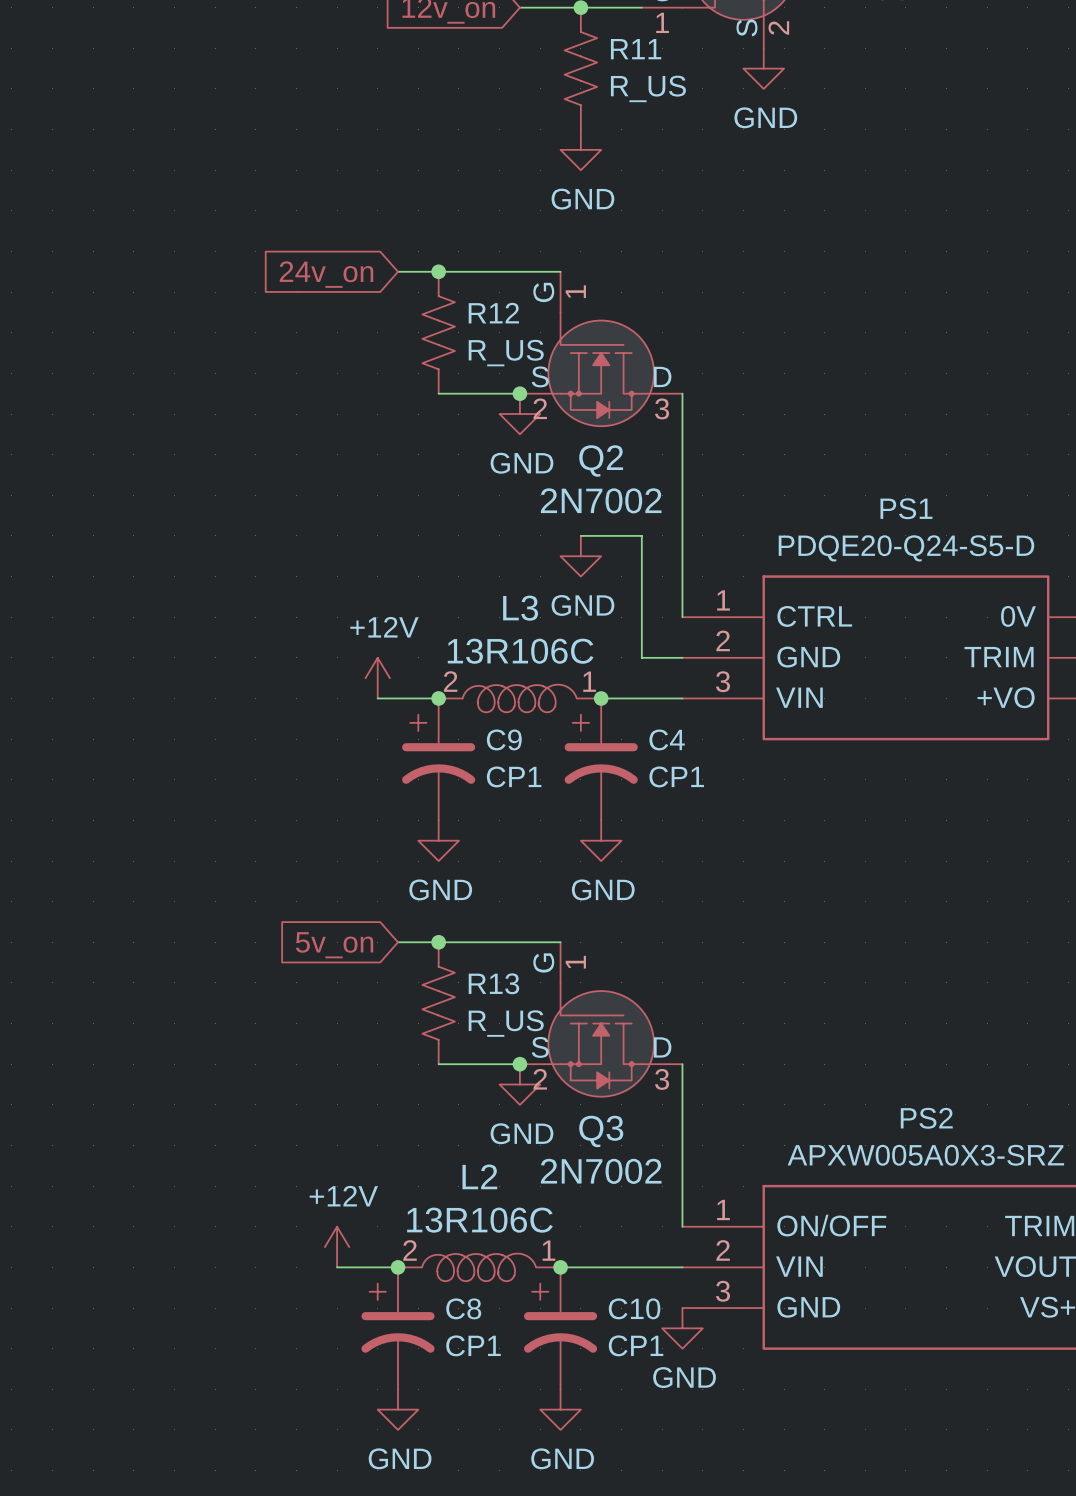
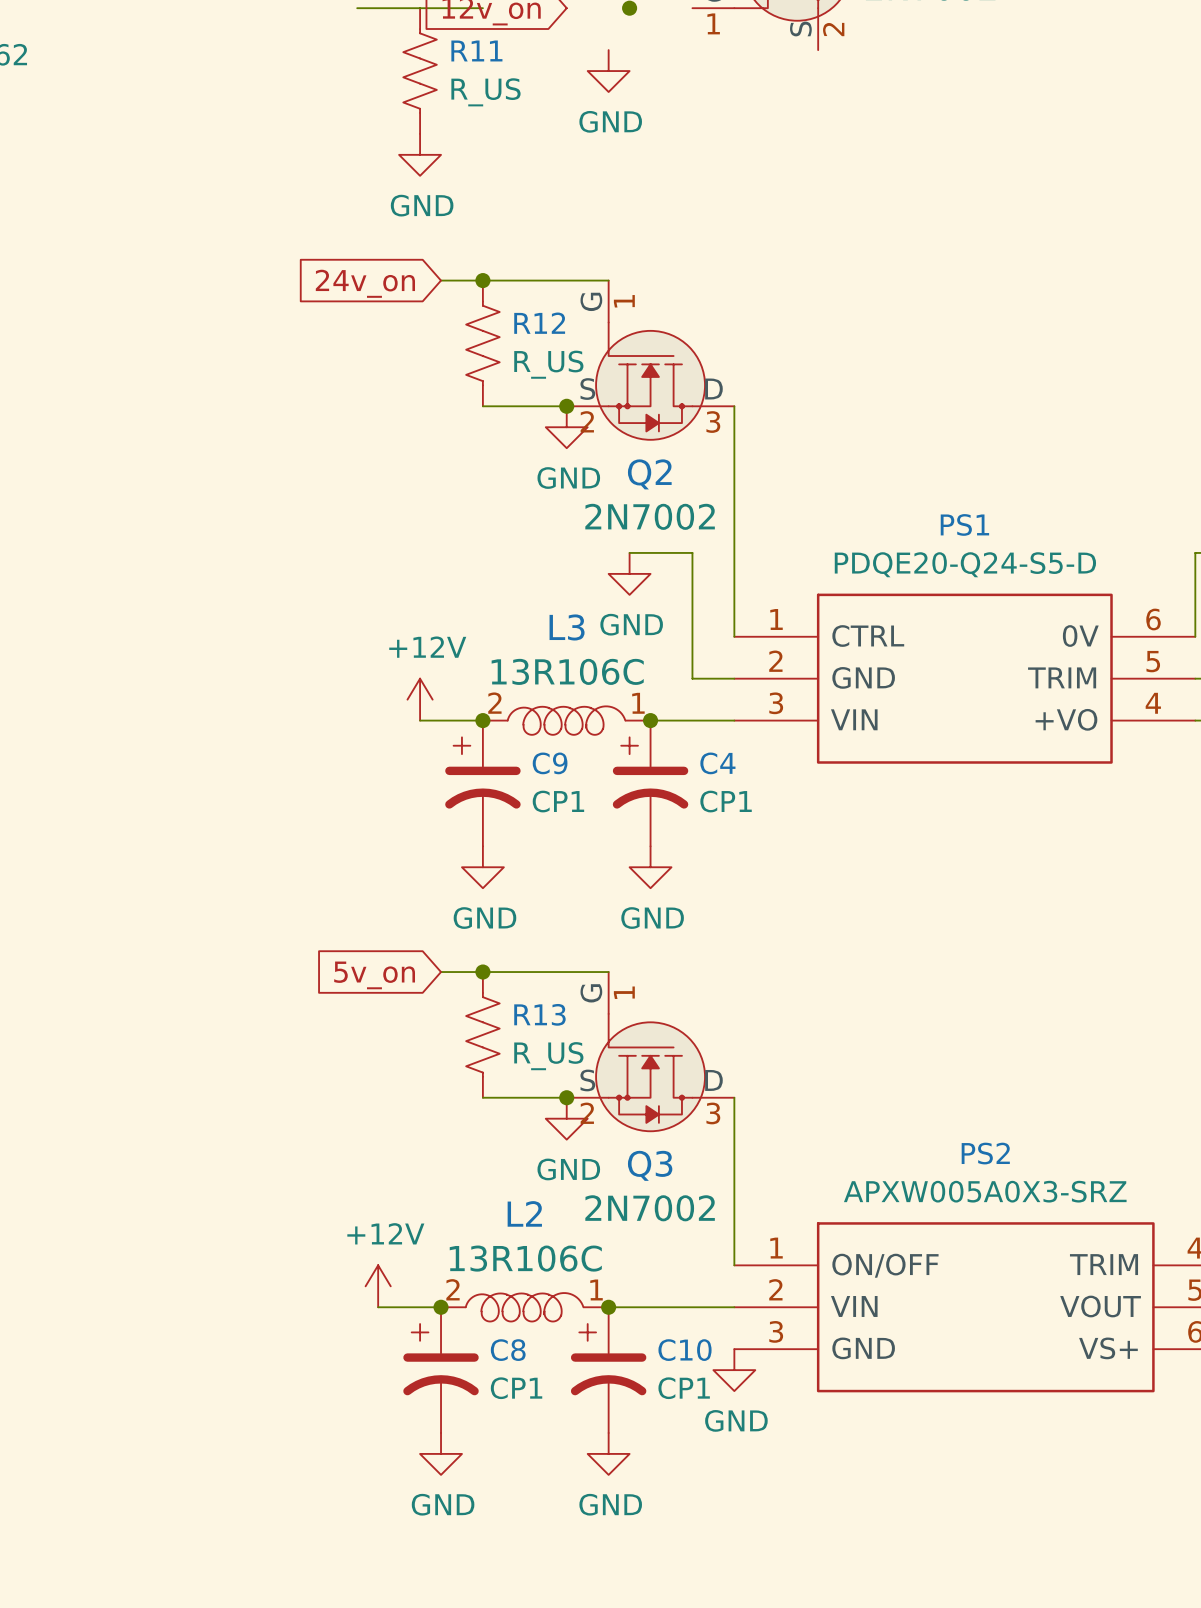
wire: (519, 7) (641, 7) -> (357, 8) (482, 8)
R11 position: (580, 68) -> (420, 71)
power symbol: GND (763, 68) -> none
power symbol: none -> GND (420, 154)
power symbol position: GND (580, 149) -> GND (608, 71)

